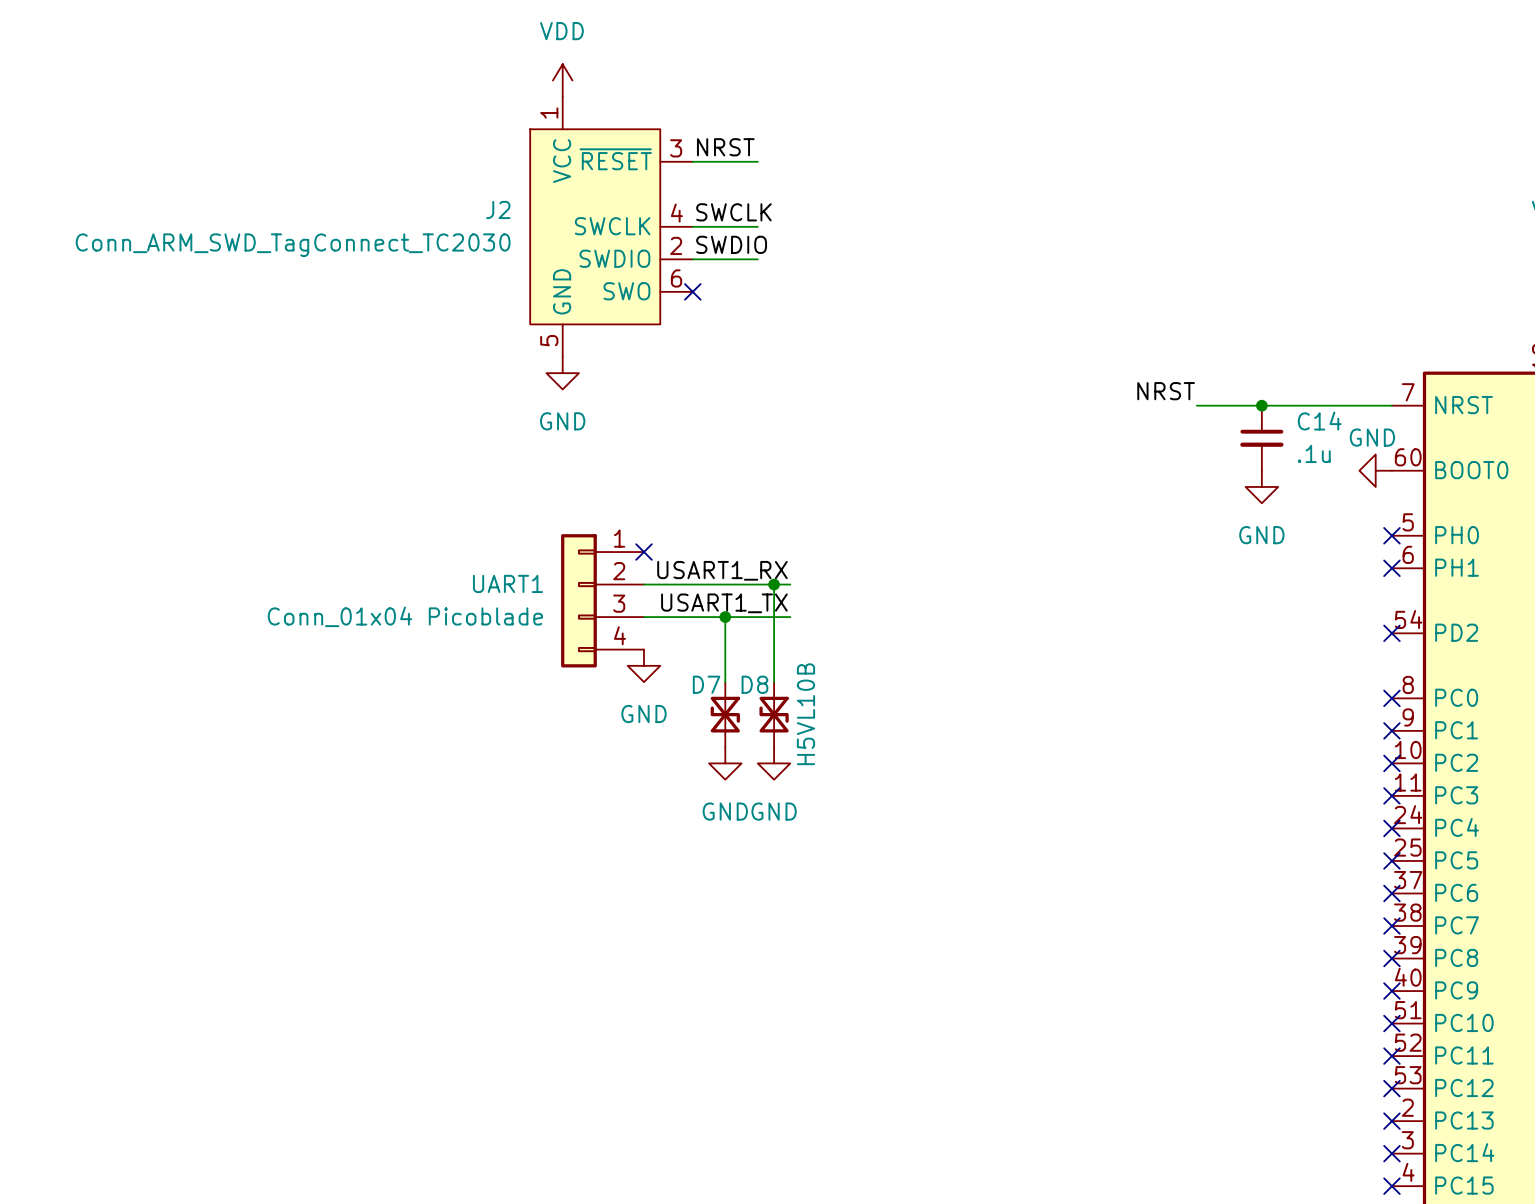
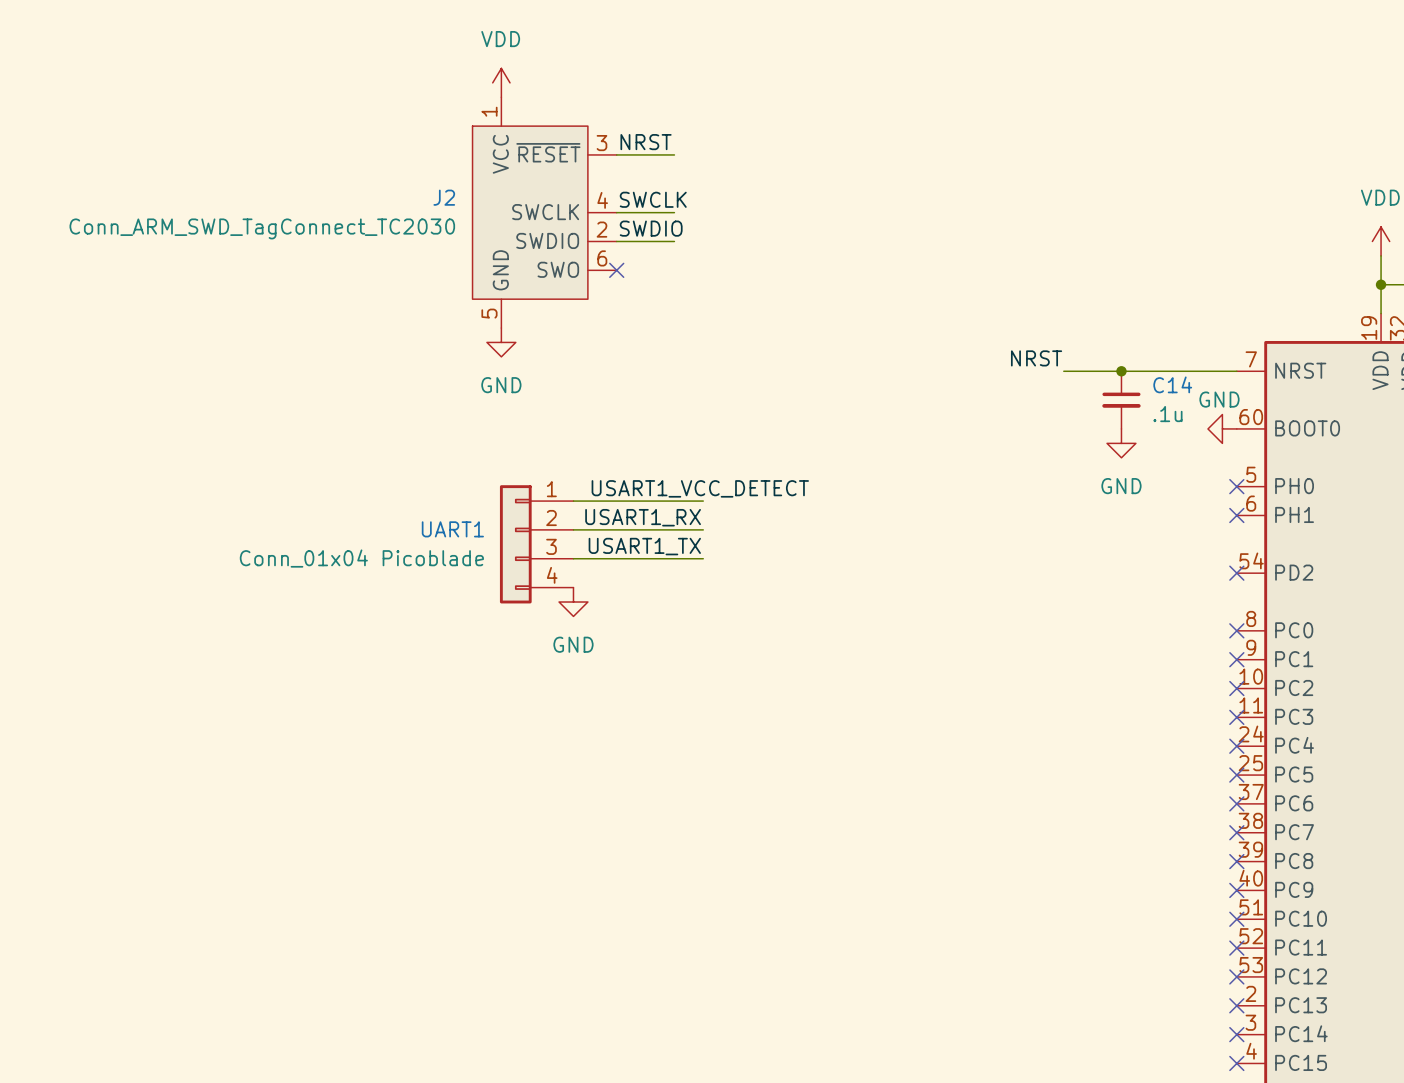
label: none -> USART1_VCC_DETECT (700, 488)
wire: none -> (573, 501) (703, 501)
no-connect mark: (644, 552) -> none
wire: (774, 584) (774, 682) -> none
junction: (774, 584) -> none
wire: (725, 617) (725, 682) -> none
junction: (725, 617) -> none
D7: (725, 714) -> none
D8: H5VL10B (774, 714) -> none
power symbol: GND (725, 763) -> none
power symbol: GND (774, 763) -> none

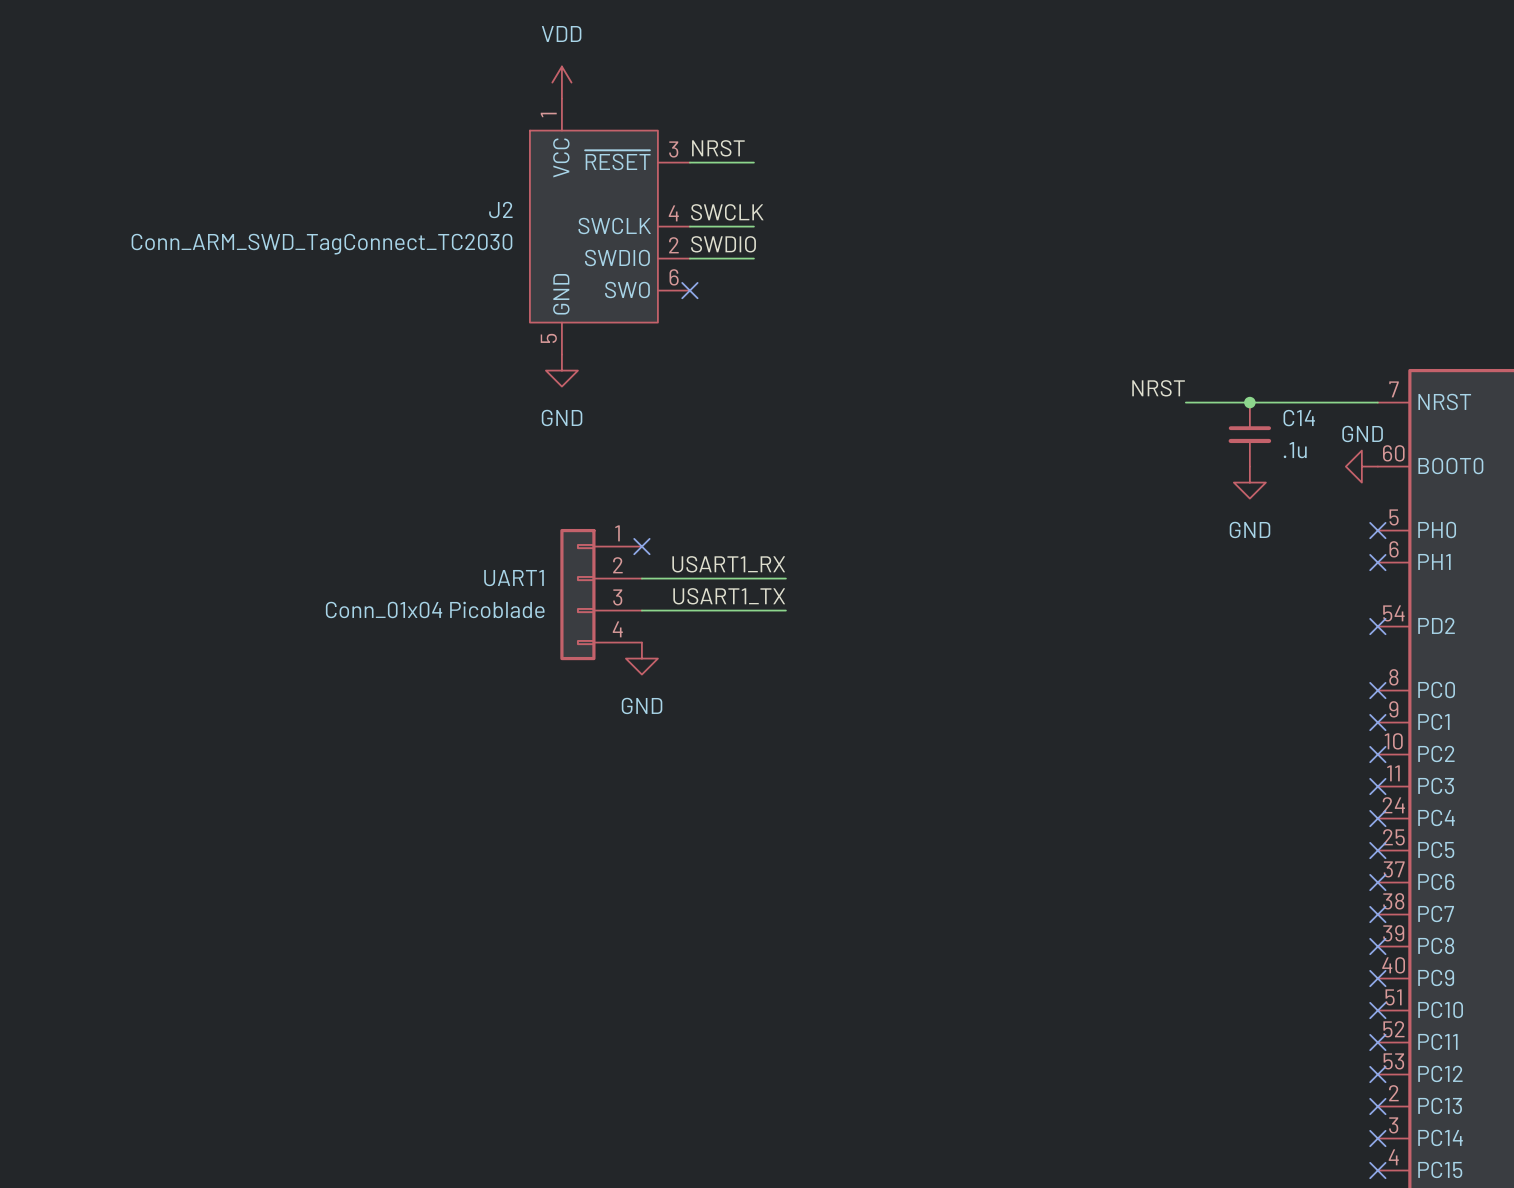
label: USART1_VCC_DETECT (700, 488) -> none
wire: (573, 501) (703, 501) -> none
no-connect mark: none -> (641, 546)

